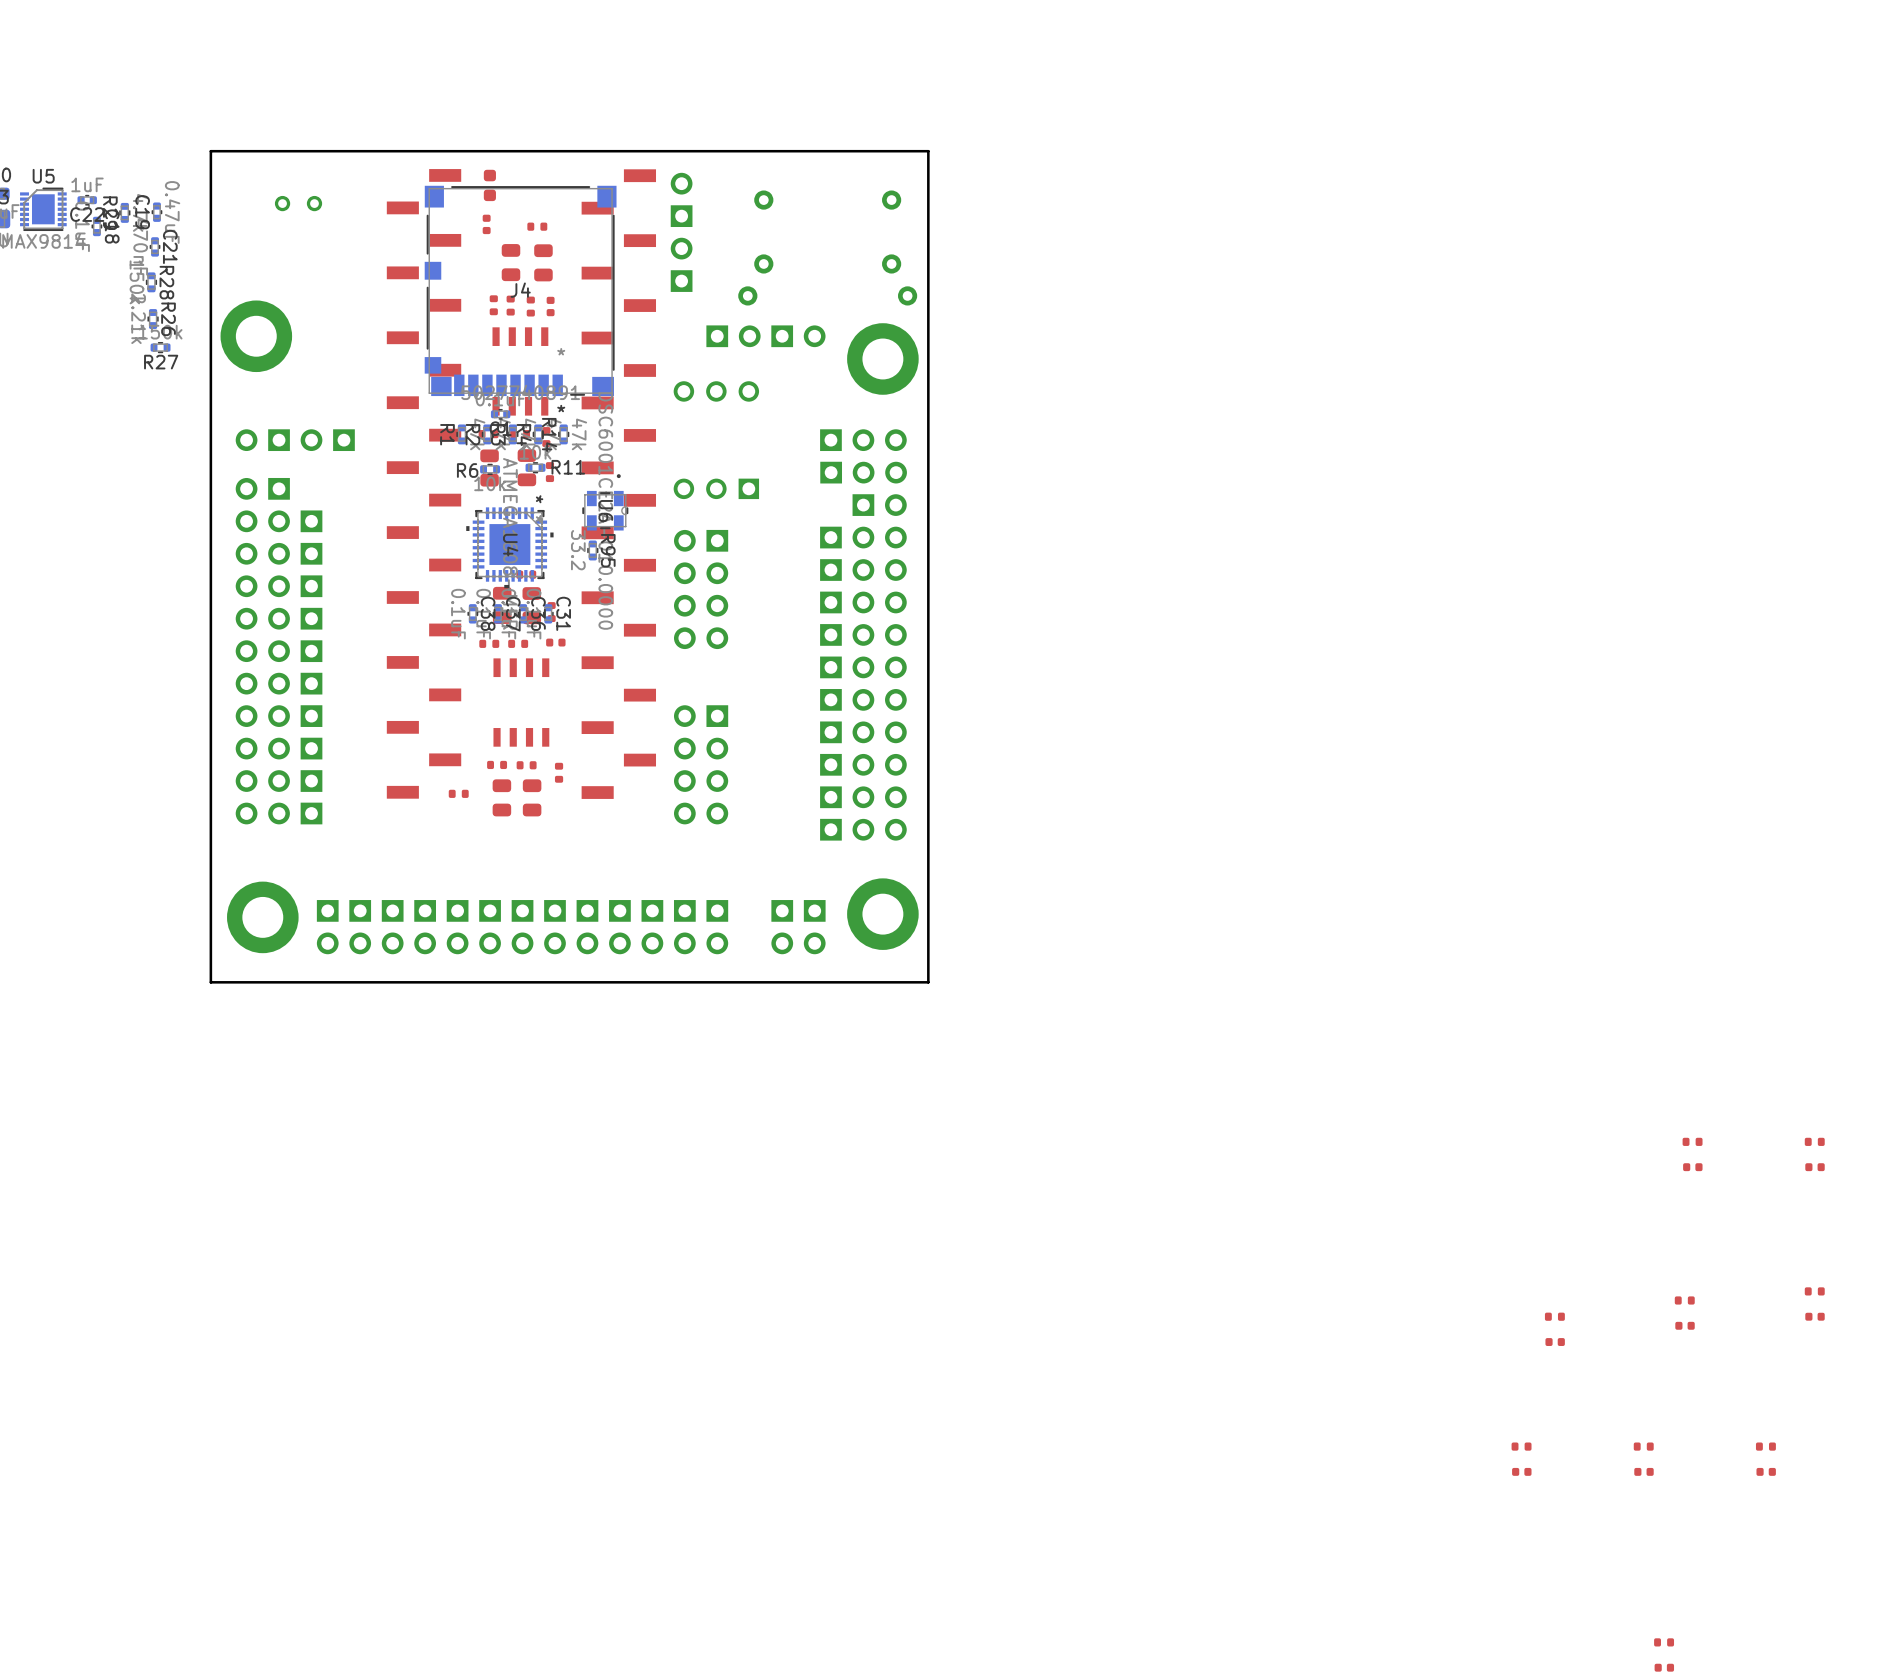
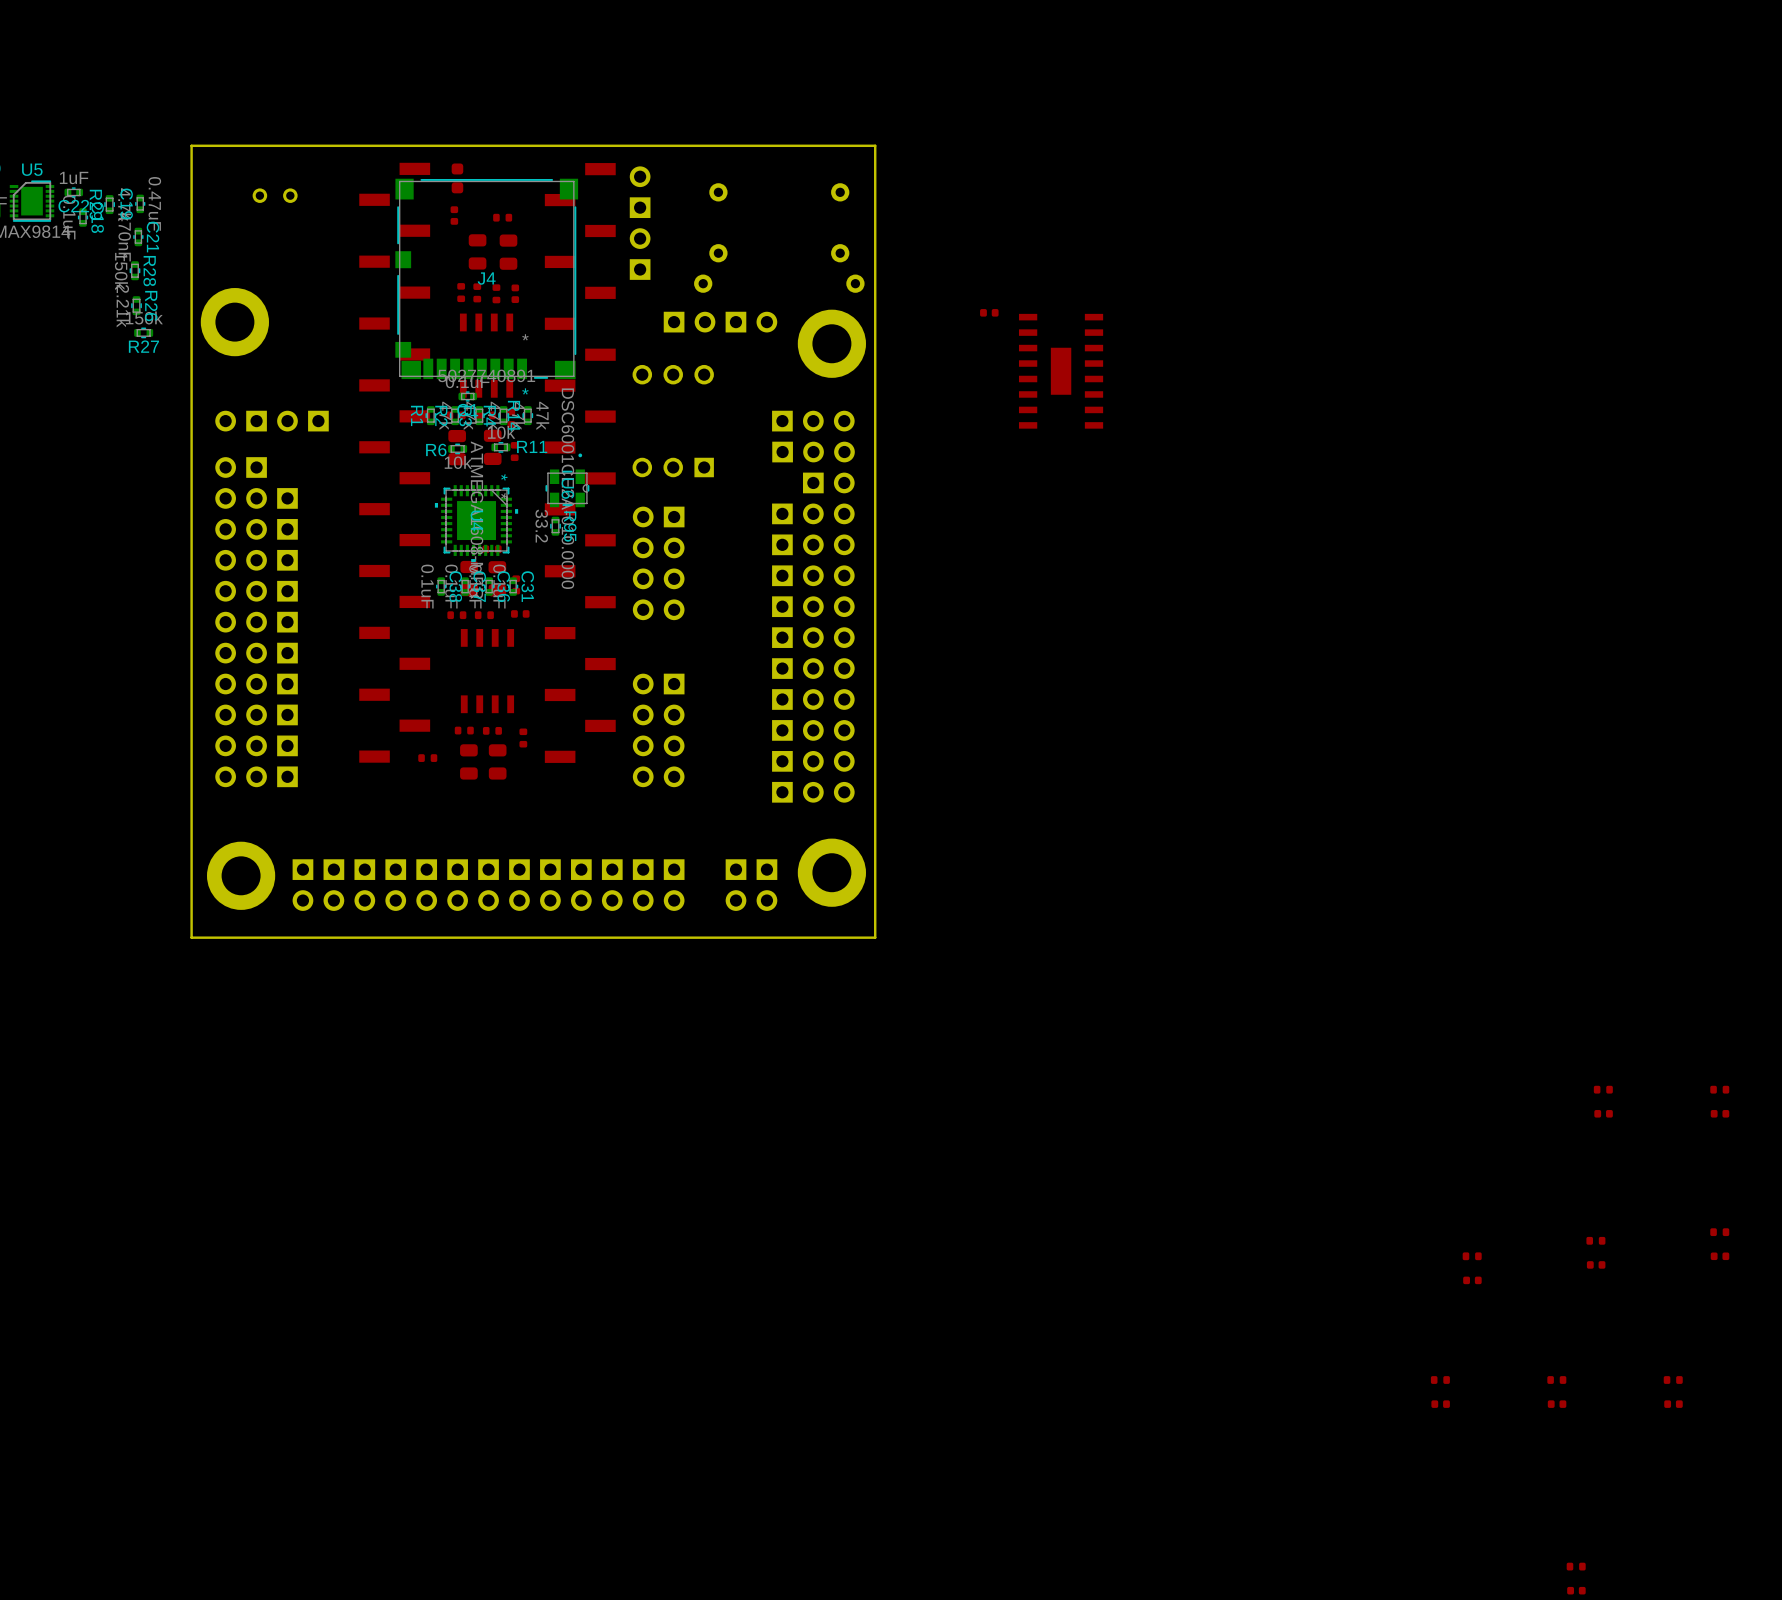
part: none -> (989, 312)
part: none -> (1061, 371)

